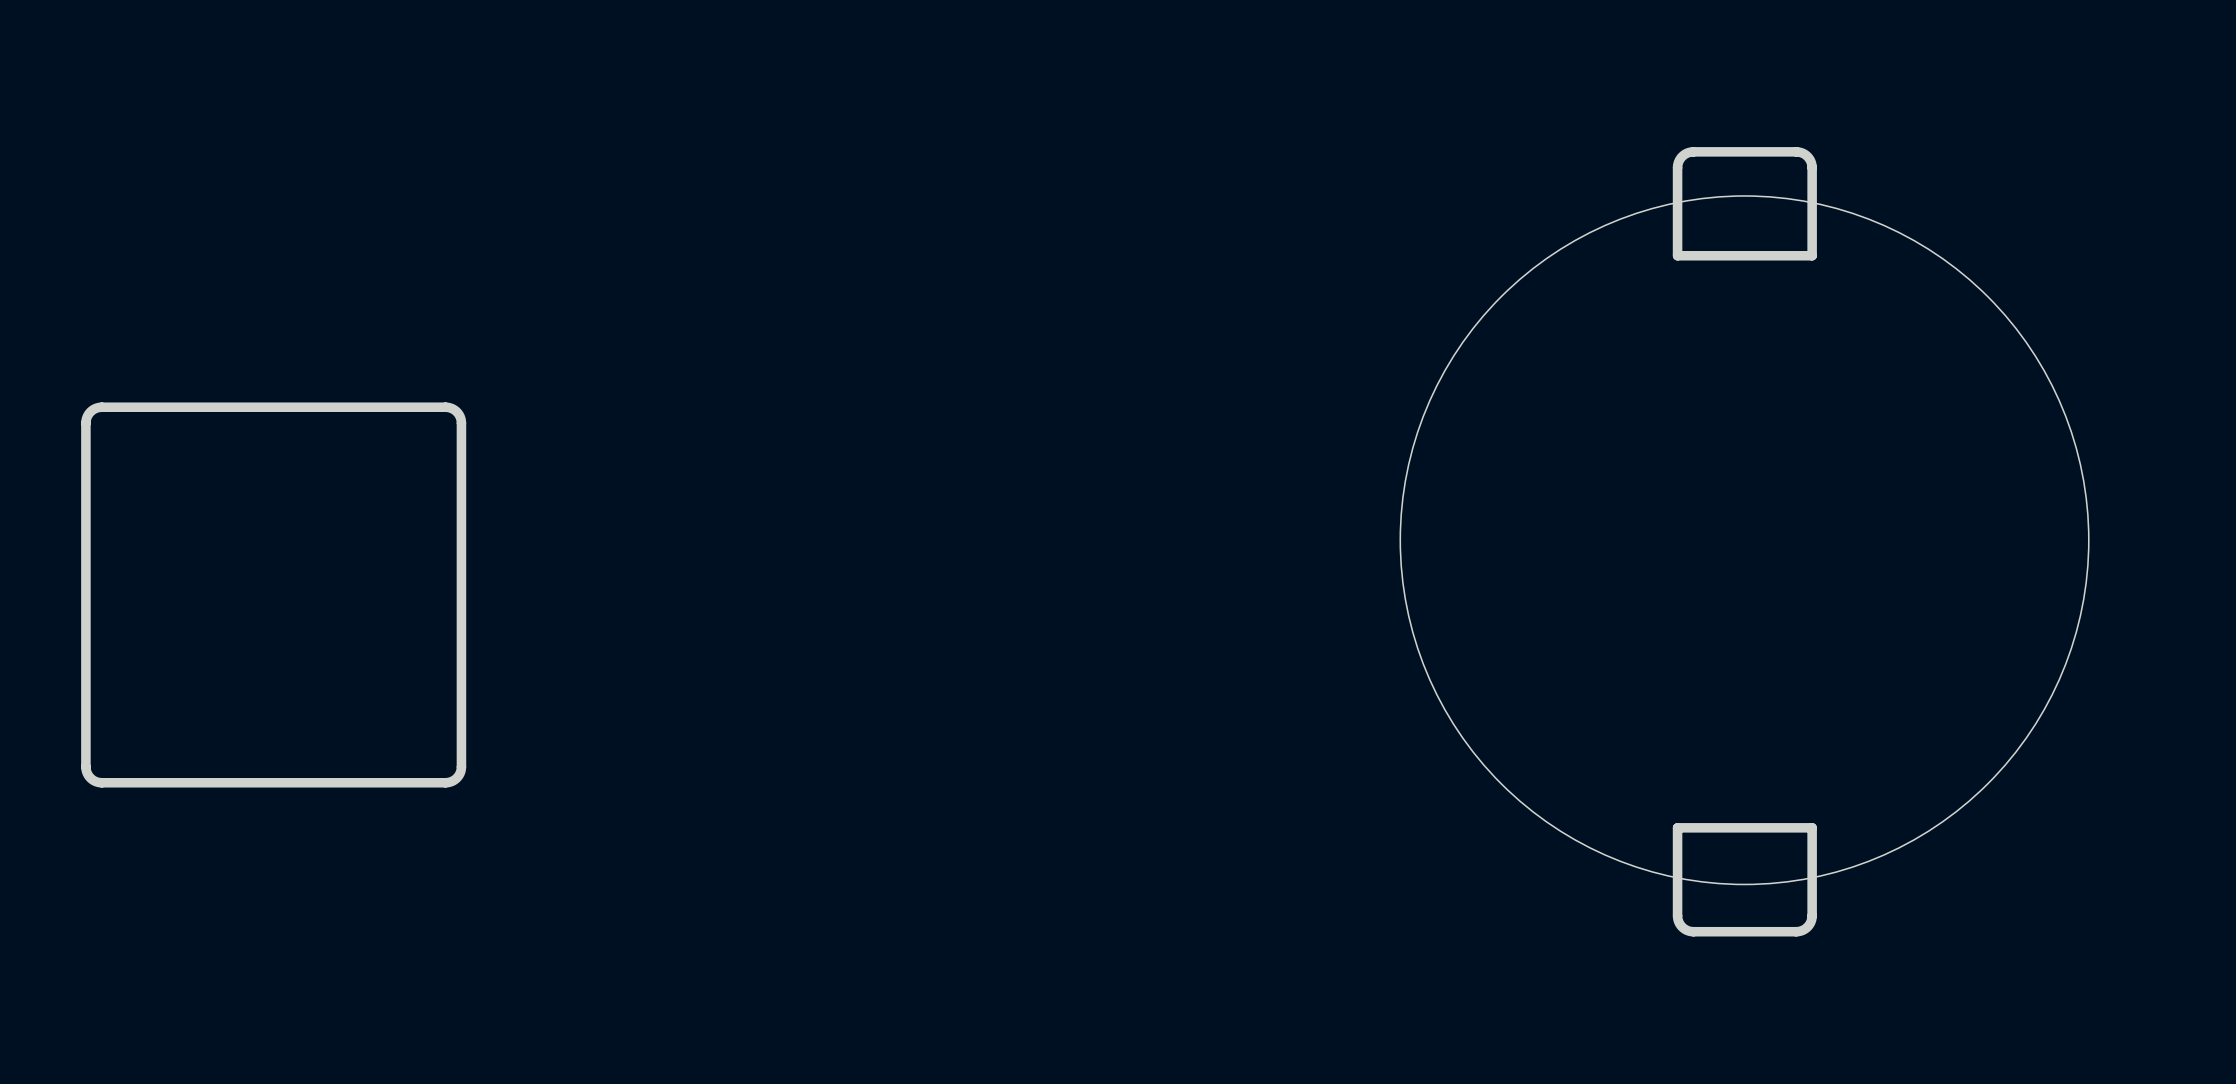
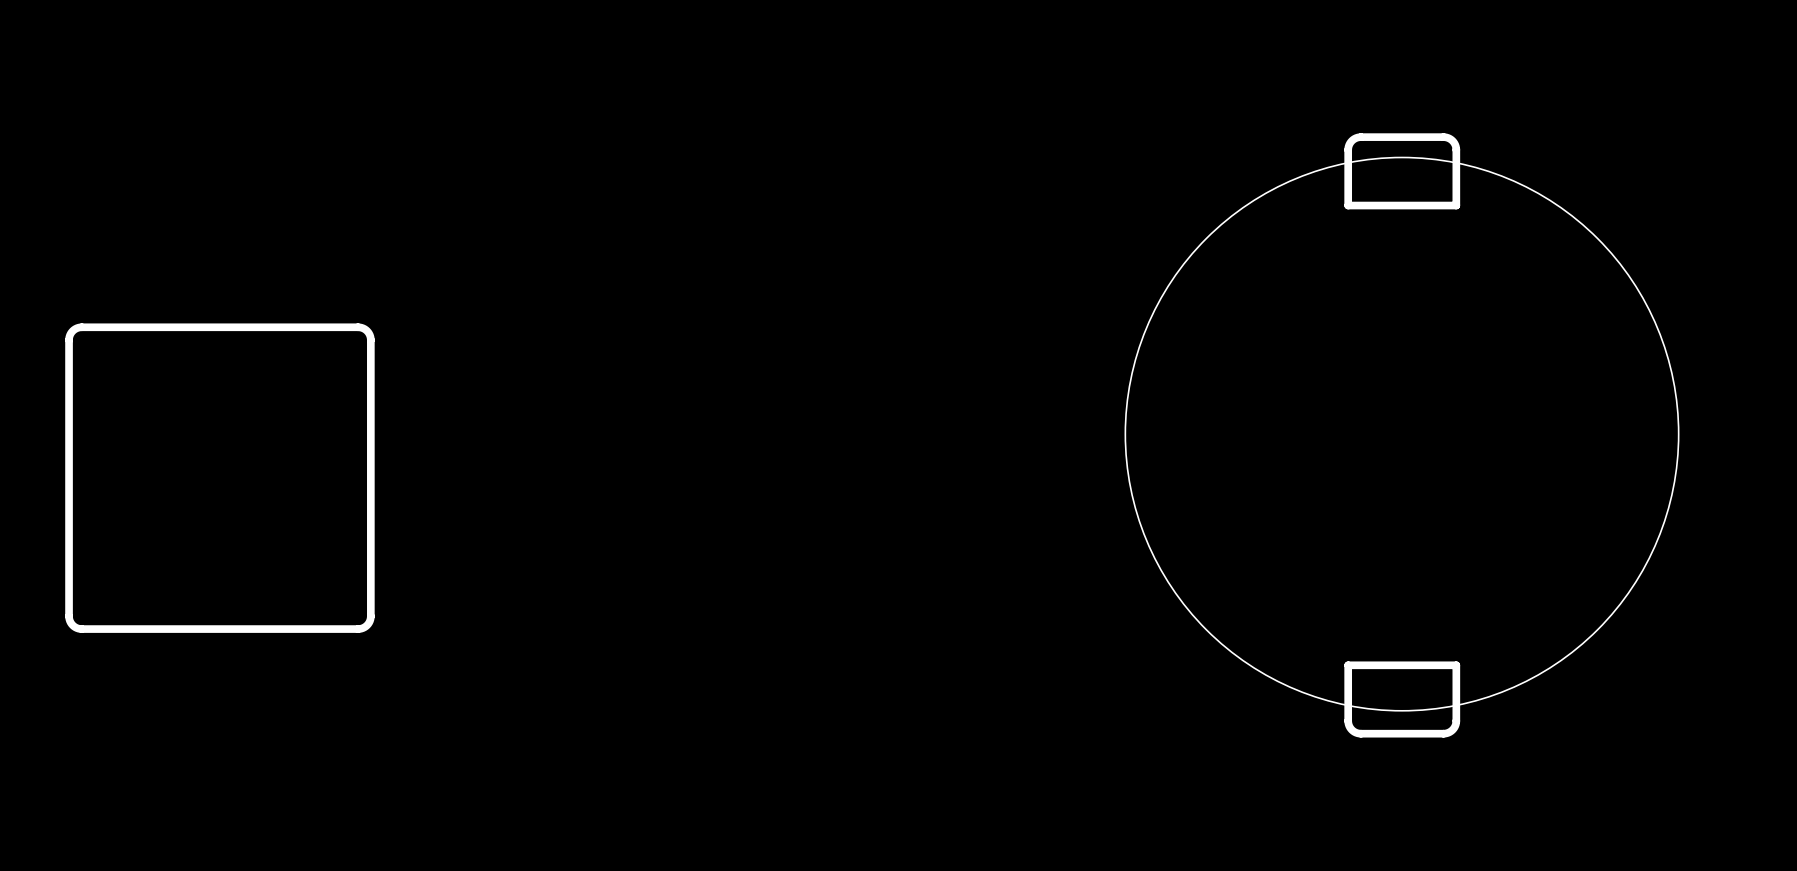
board edge: (1812, 186) (1810, 161) (1804, 153) (1796, 151) (1689, 152) (1682, 156) (1678, 161) (1677, 186) -> (1456, 149) (1452, 140) (1443, 137) (1359, 137) (1351, 140) (1348, 149)
board edge: (1812, 897) (1810, 921) (1804, 929) (1796, 931) (1689, 931) (1682, 927) (1678, 921) (1677, 897) -> (1456, 720) (1452, 729) (1443, 733) (1359, 733) (1351, 729) (1348, 720)

